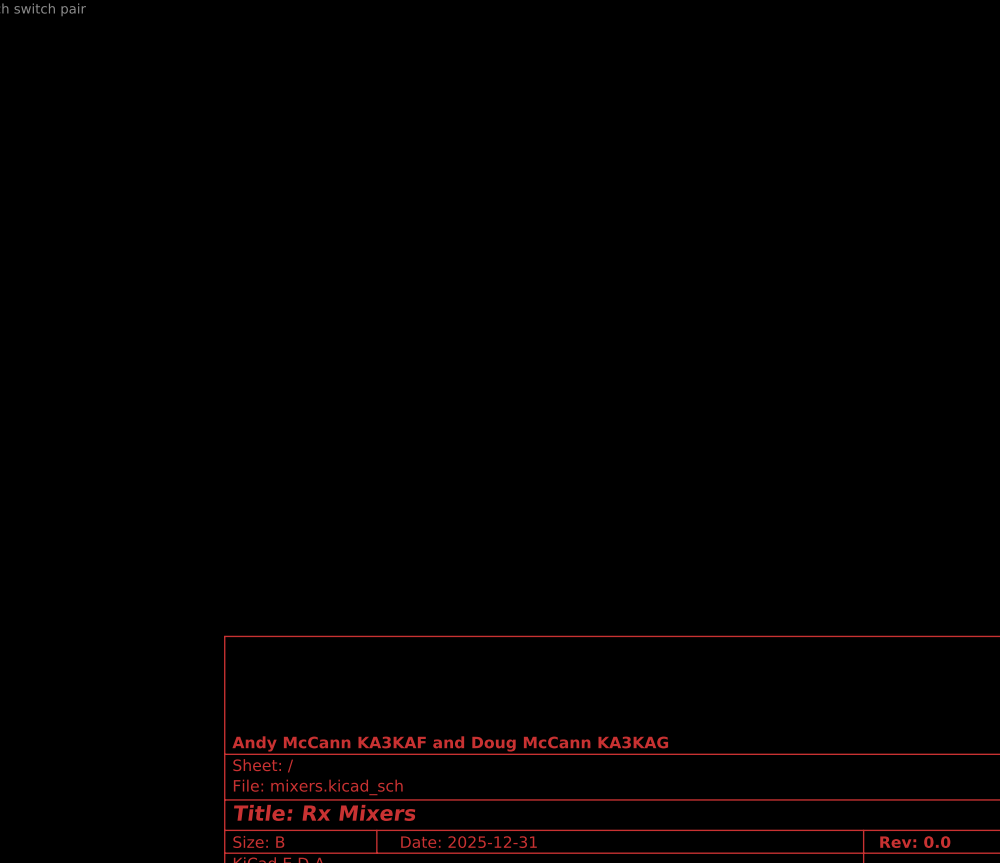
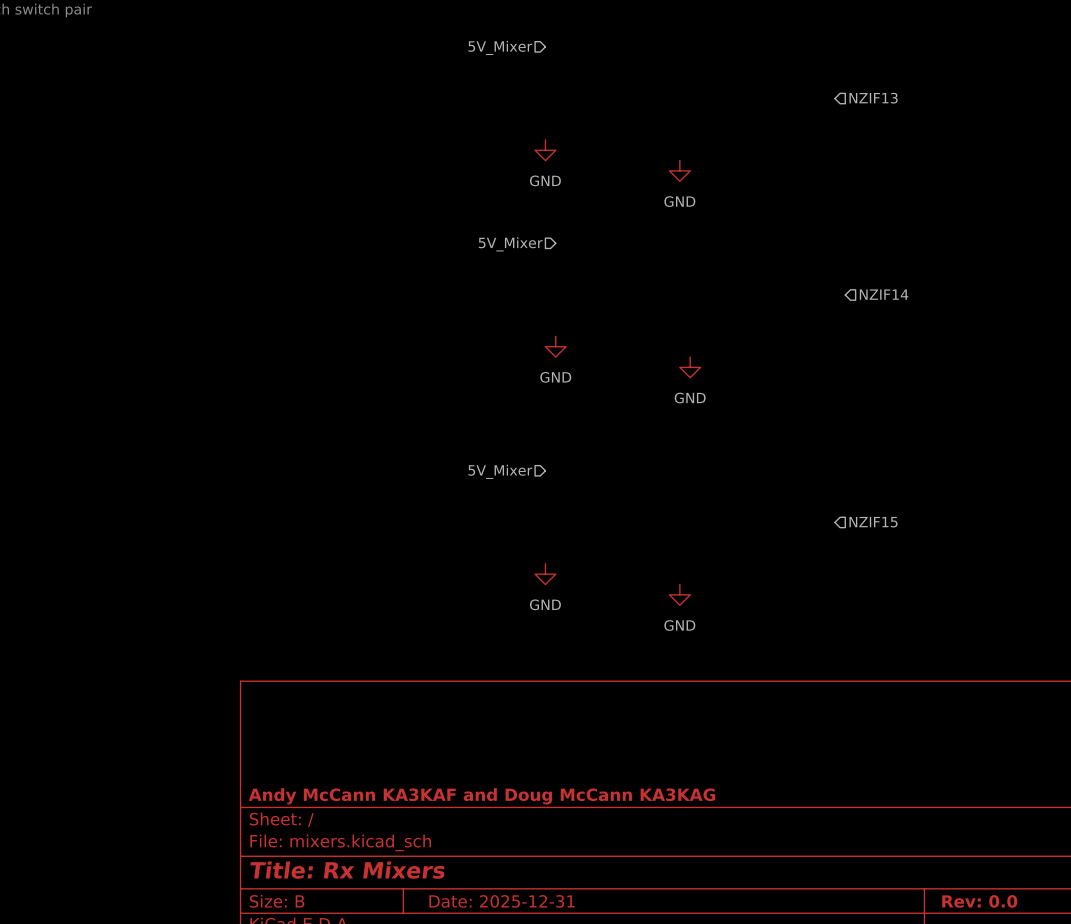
hierarchical label: none -> 5V_Mixer (500, 47)
hierarchical label: none -> NZIF13 (873, 98)
power symbol: none -> GND (545, 150)
power symbol: none -> GND (679, 170)
hierarchical label: none -> 5V_Mixer (510, 244)
hierarchical label: none -> NZIF14 (884, 294)
power symbol: none -> GND (555, 346)
power symbol: none -> GND (690, 367)
hierarchical label: none -> 5V_Mixer (500, 471)
hierarchical label: none -> NZIF15 (873, 522)
power symbol: none -> GND (545, 574)
power symbol: none -> GND (679, 594)

